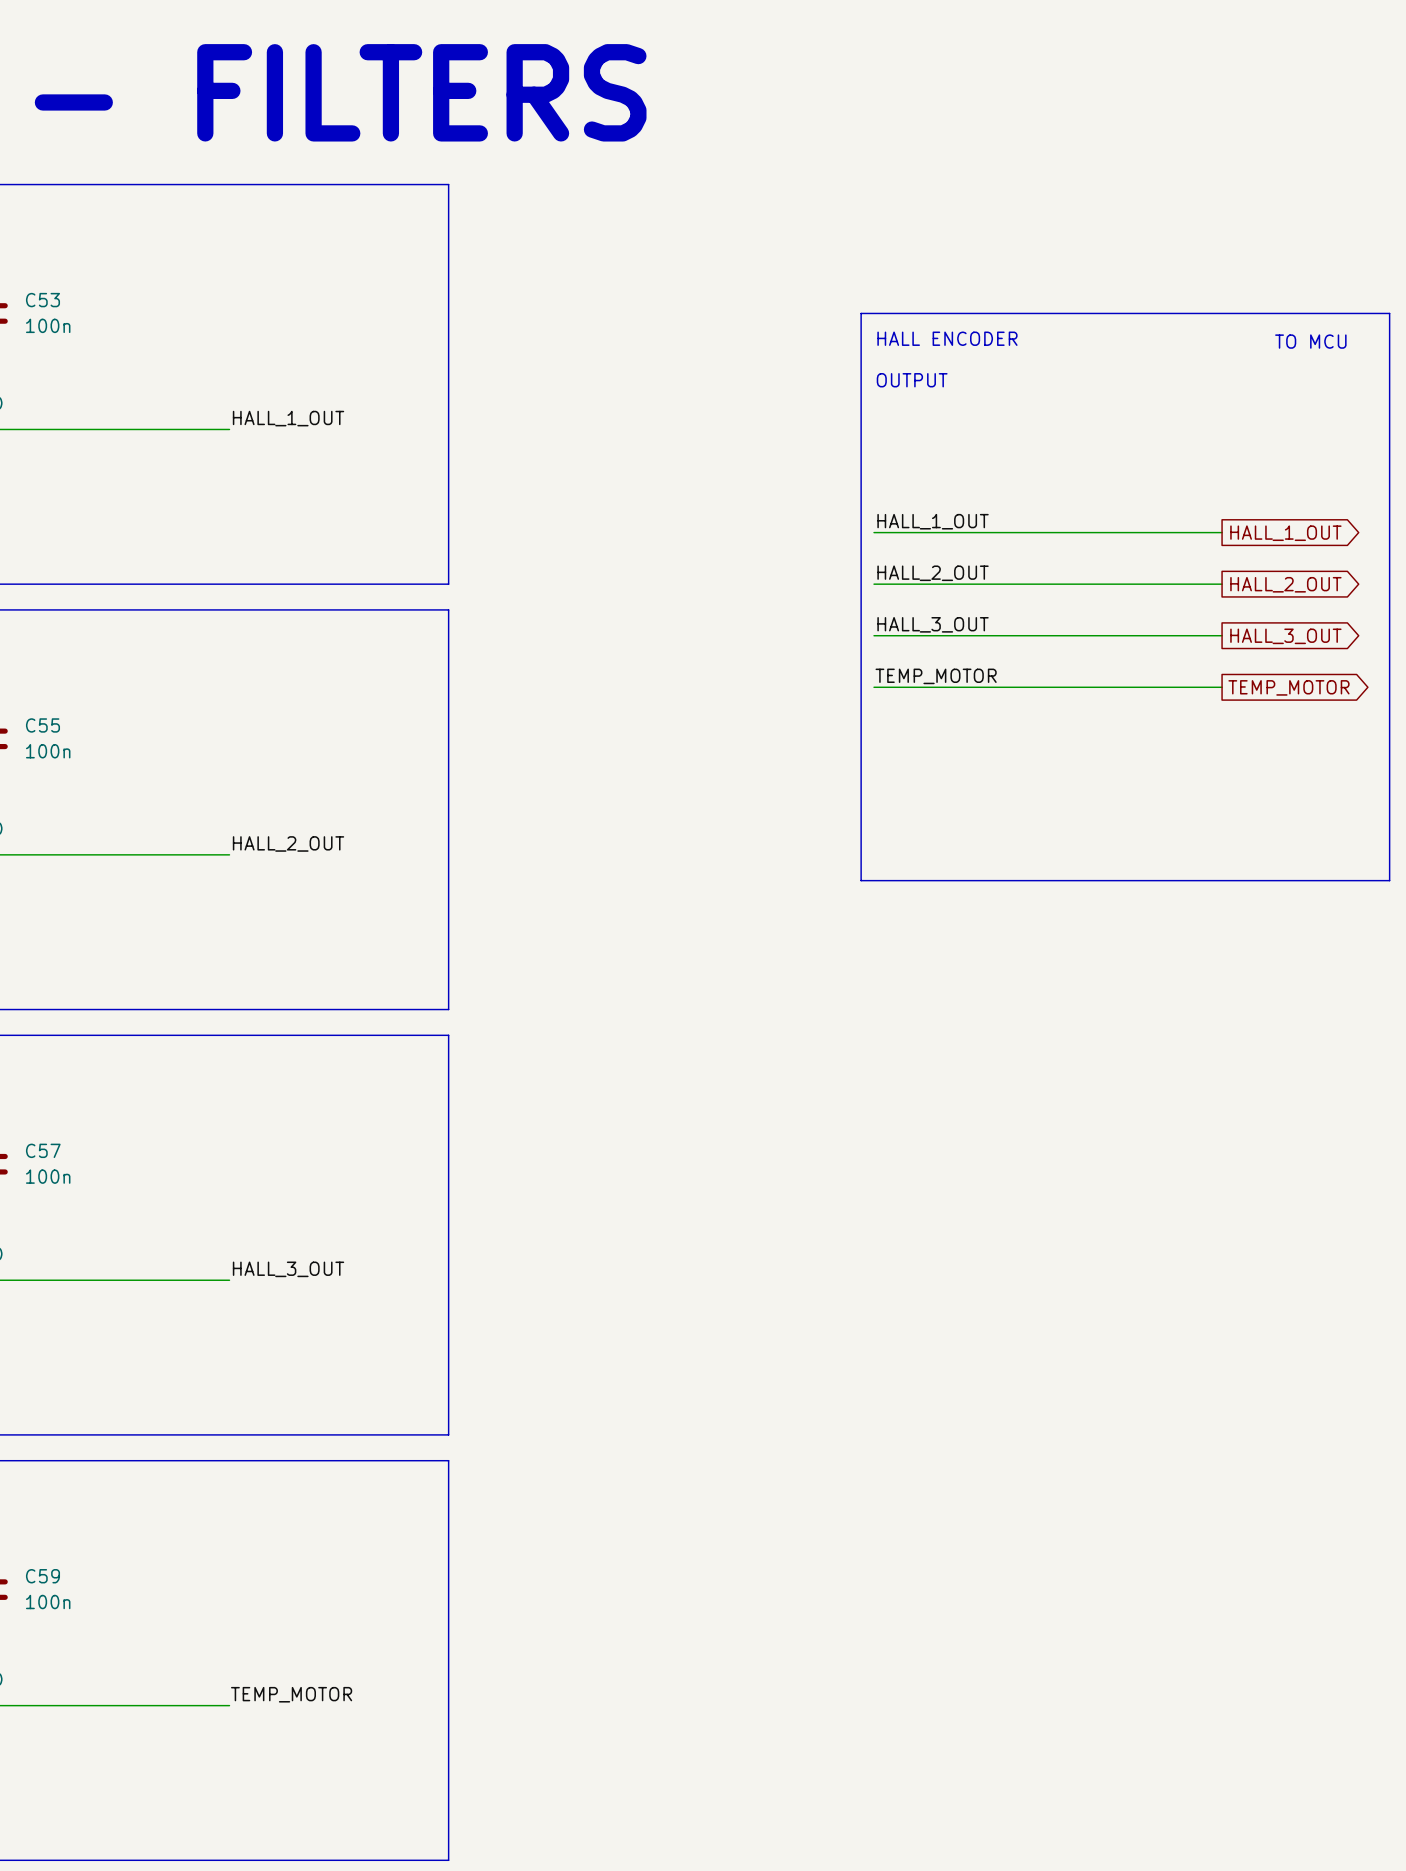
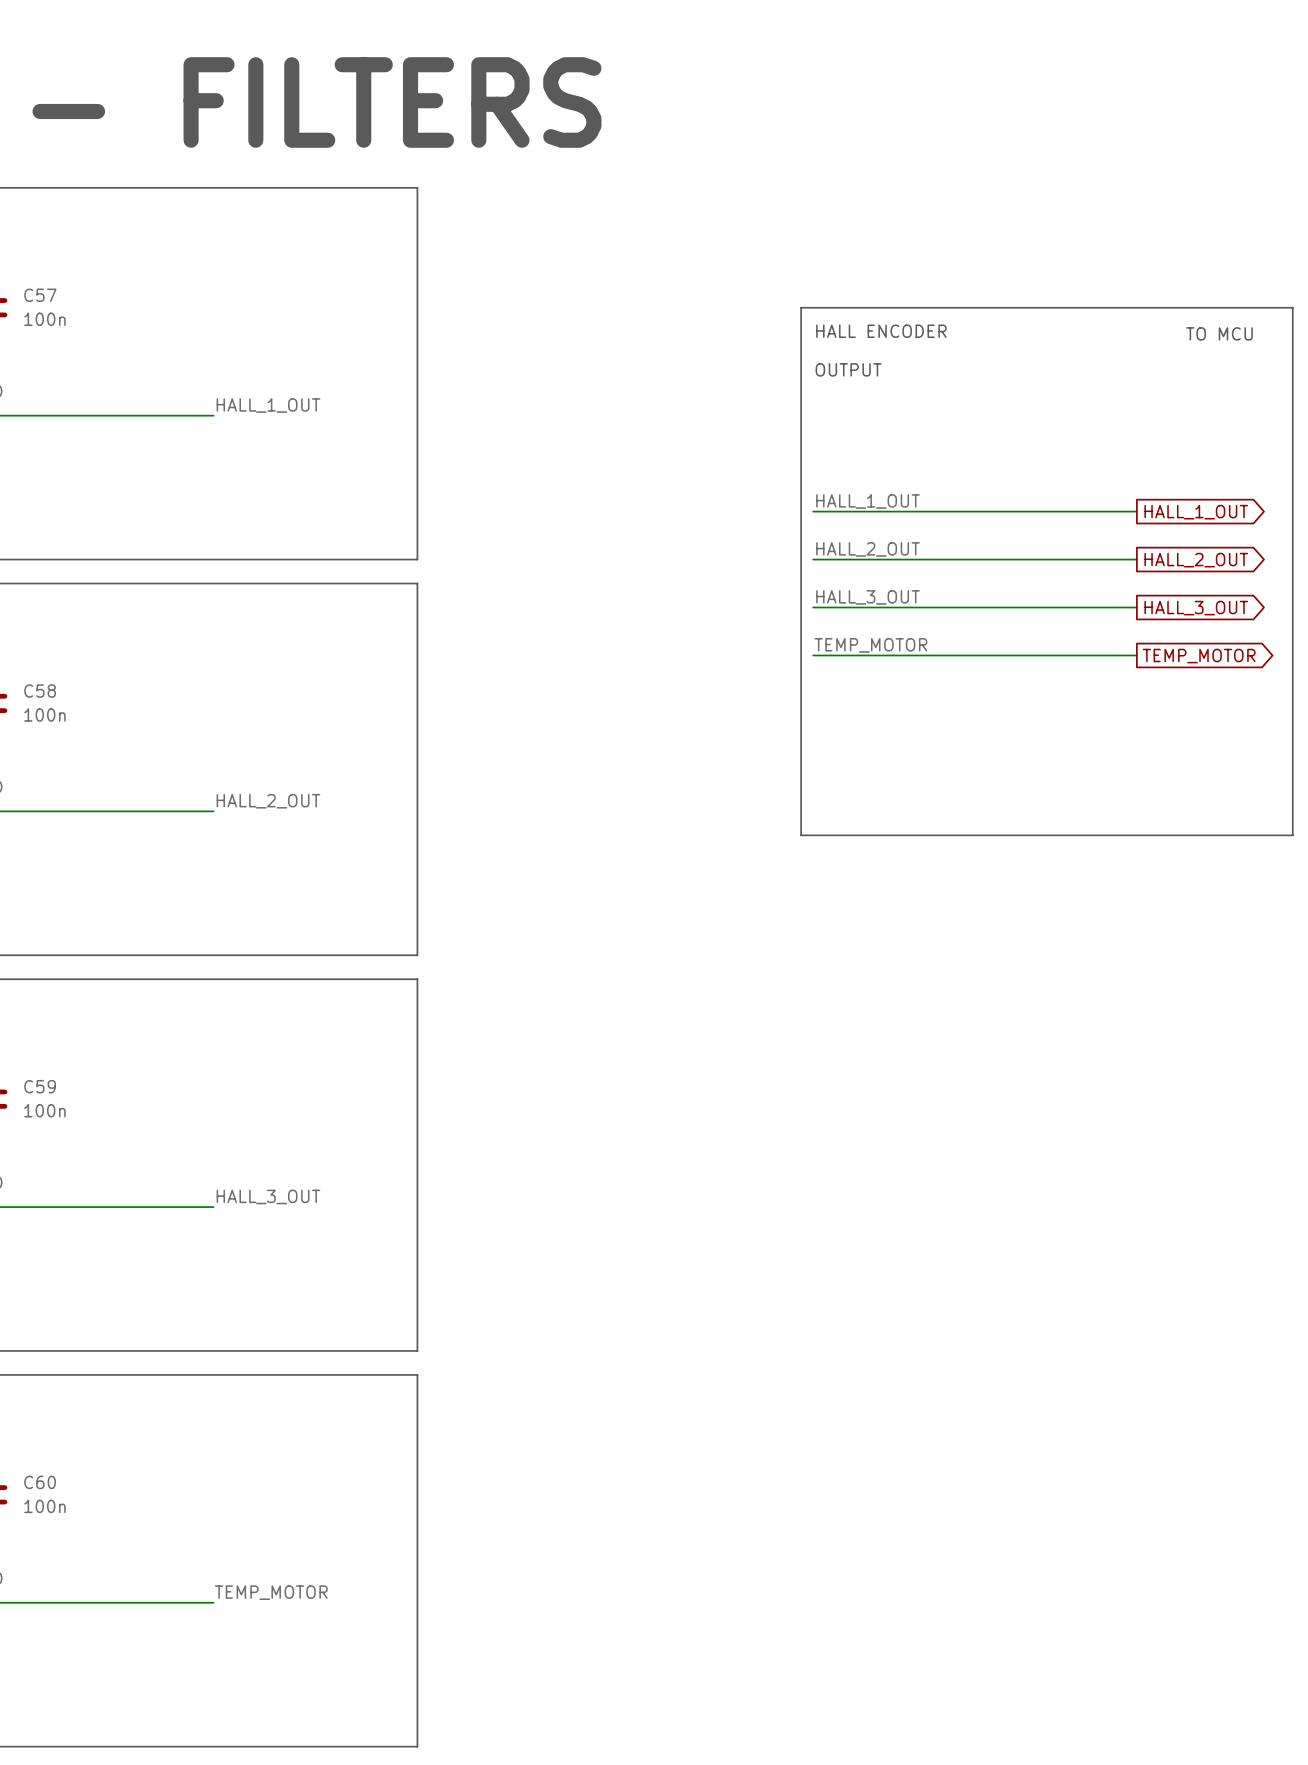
C53 name: C53 (42, 300) -> C57 (40, 295)
C55 name: C55 (42, 725) -> C58 (40, 691)
C57 name: C57 (43, 1150) -> C59 (40, 1086)
C59 name: C59 (42, 1576) -> C60 (40, 1482)

